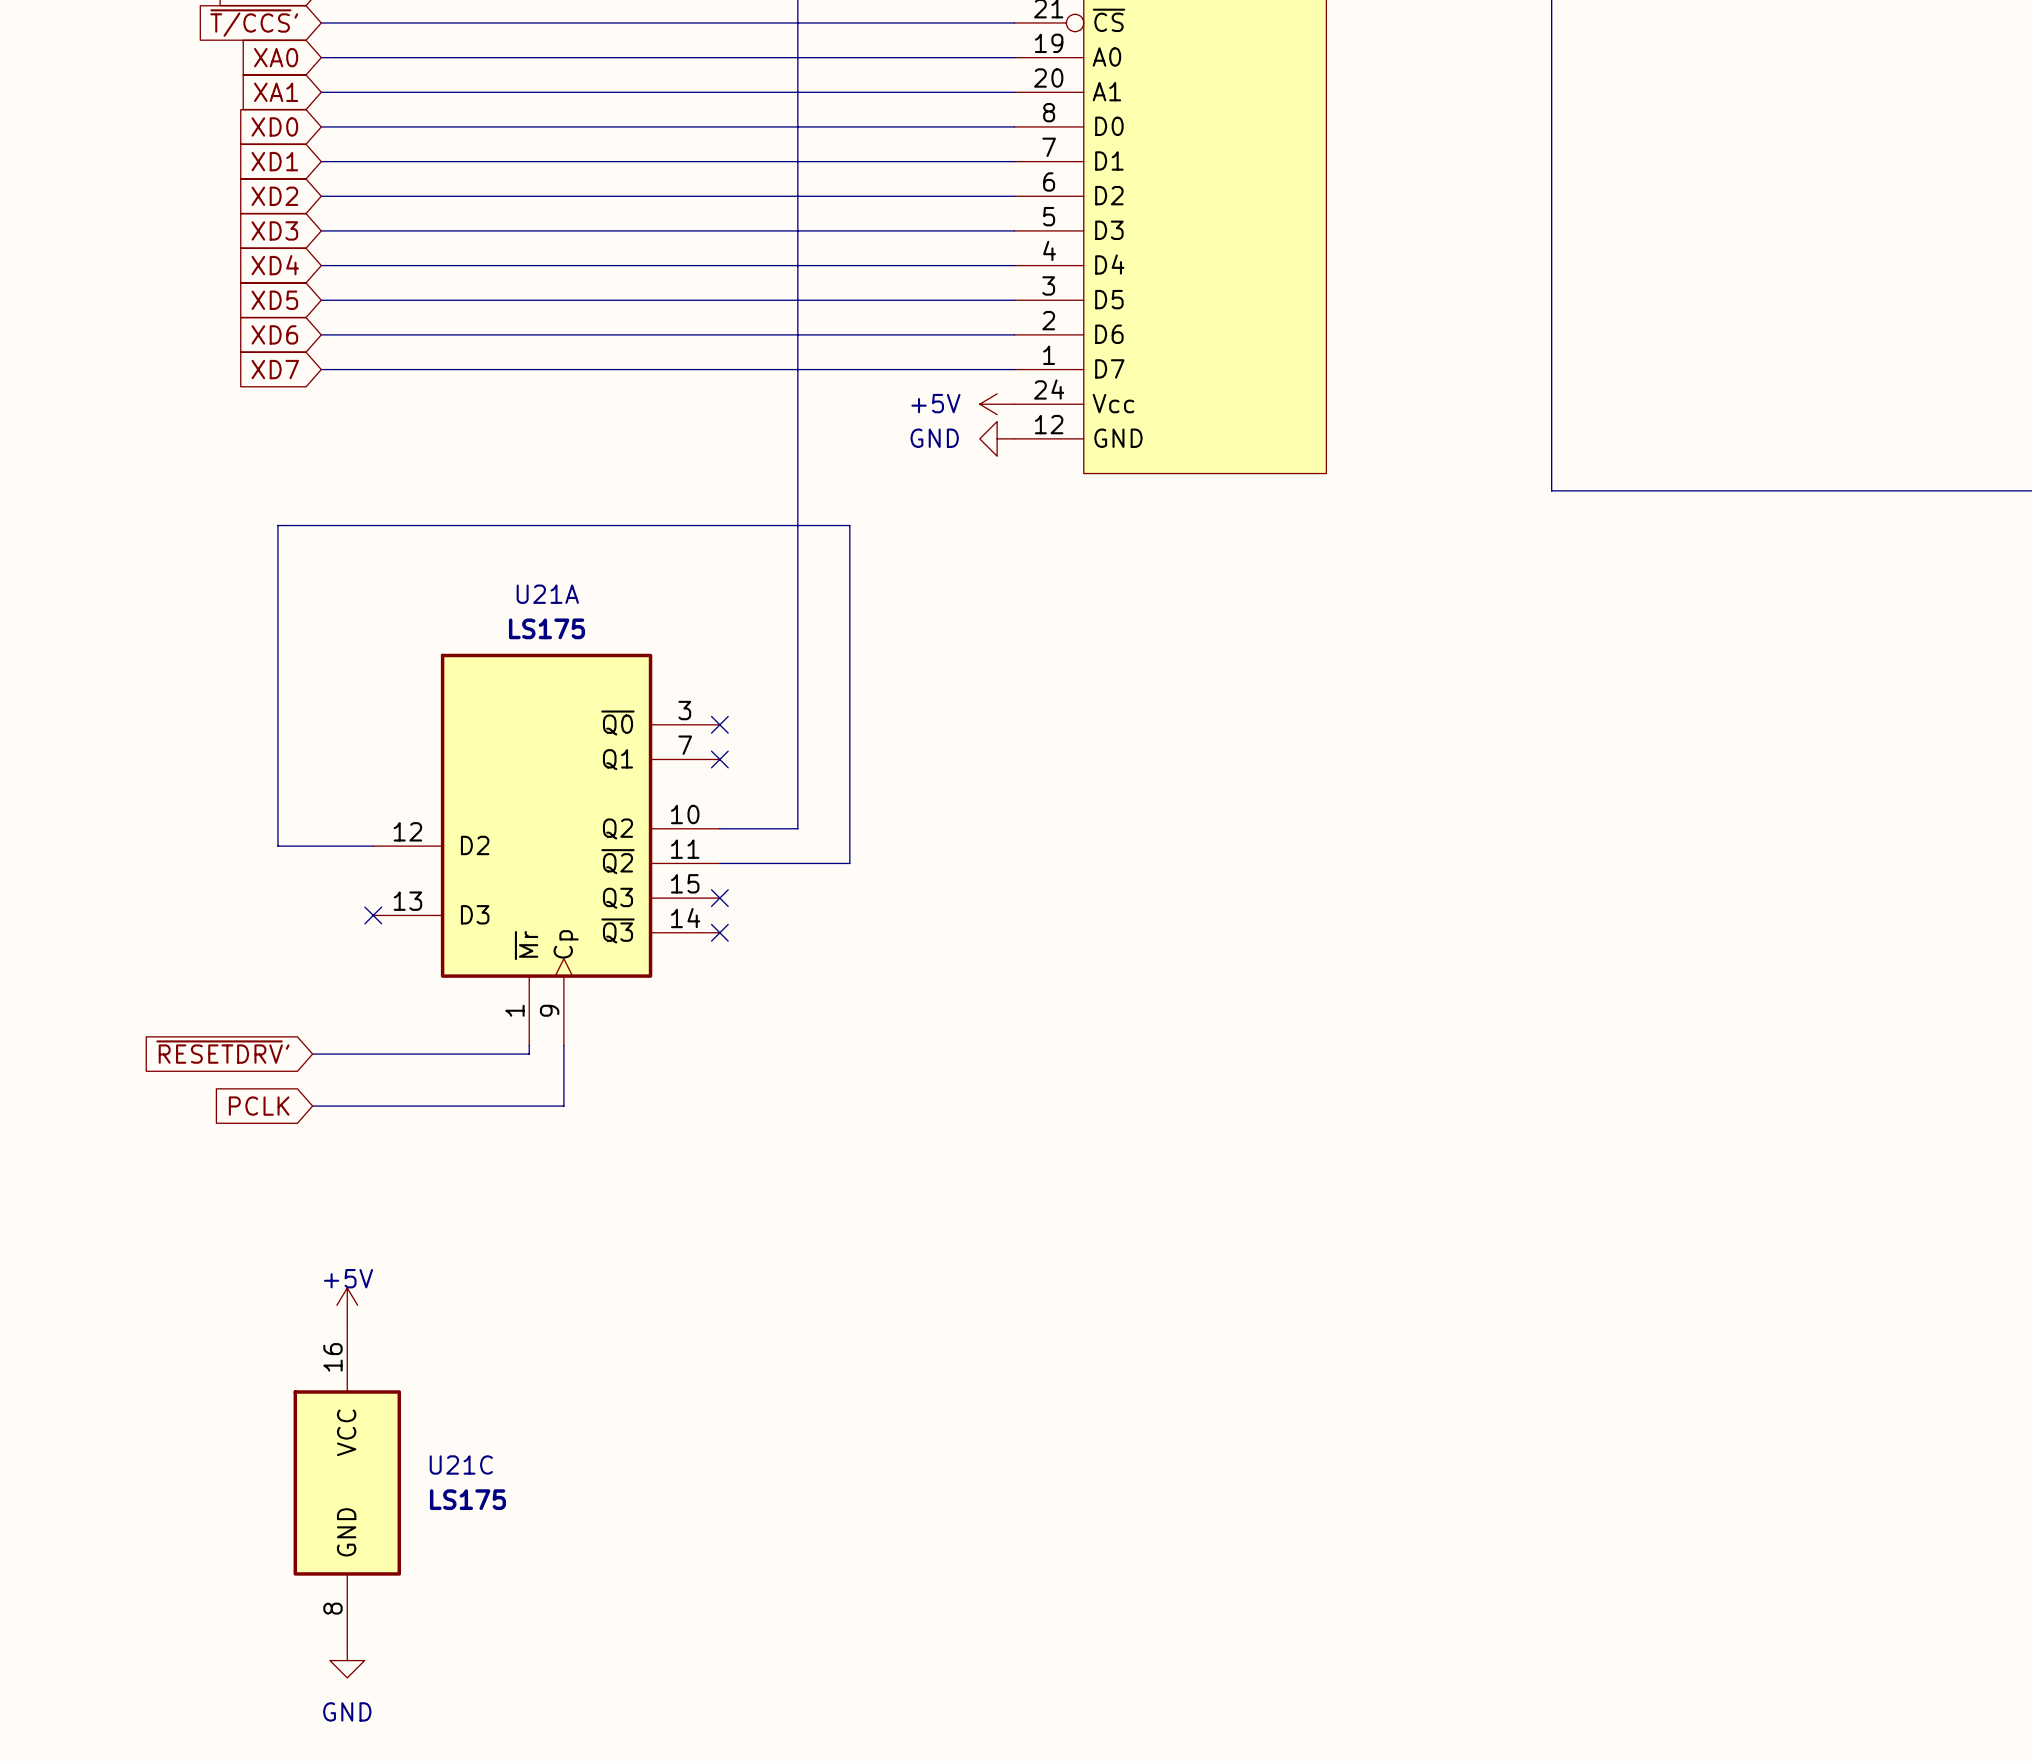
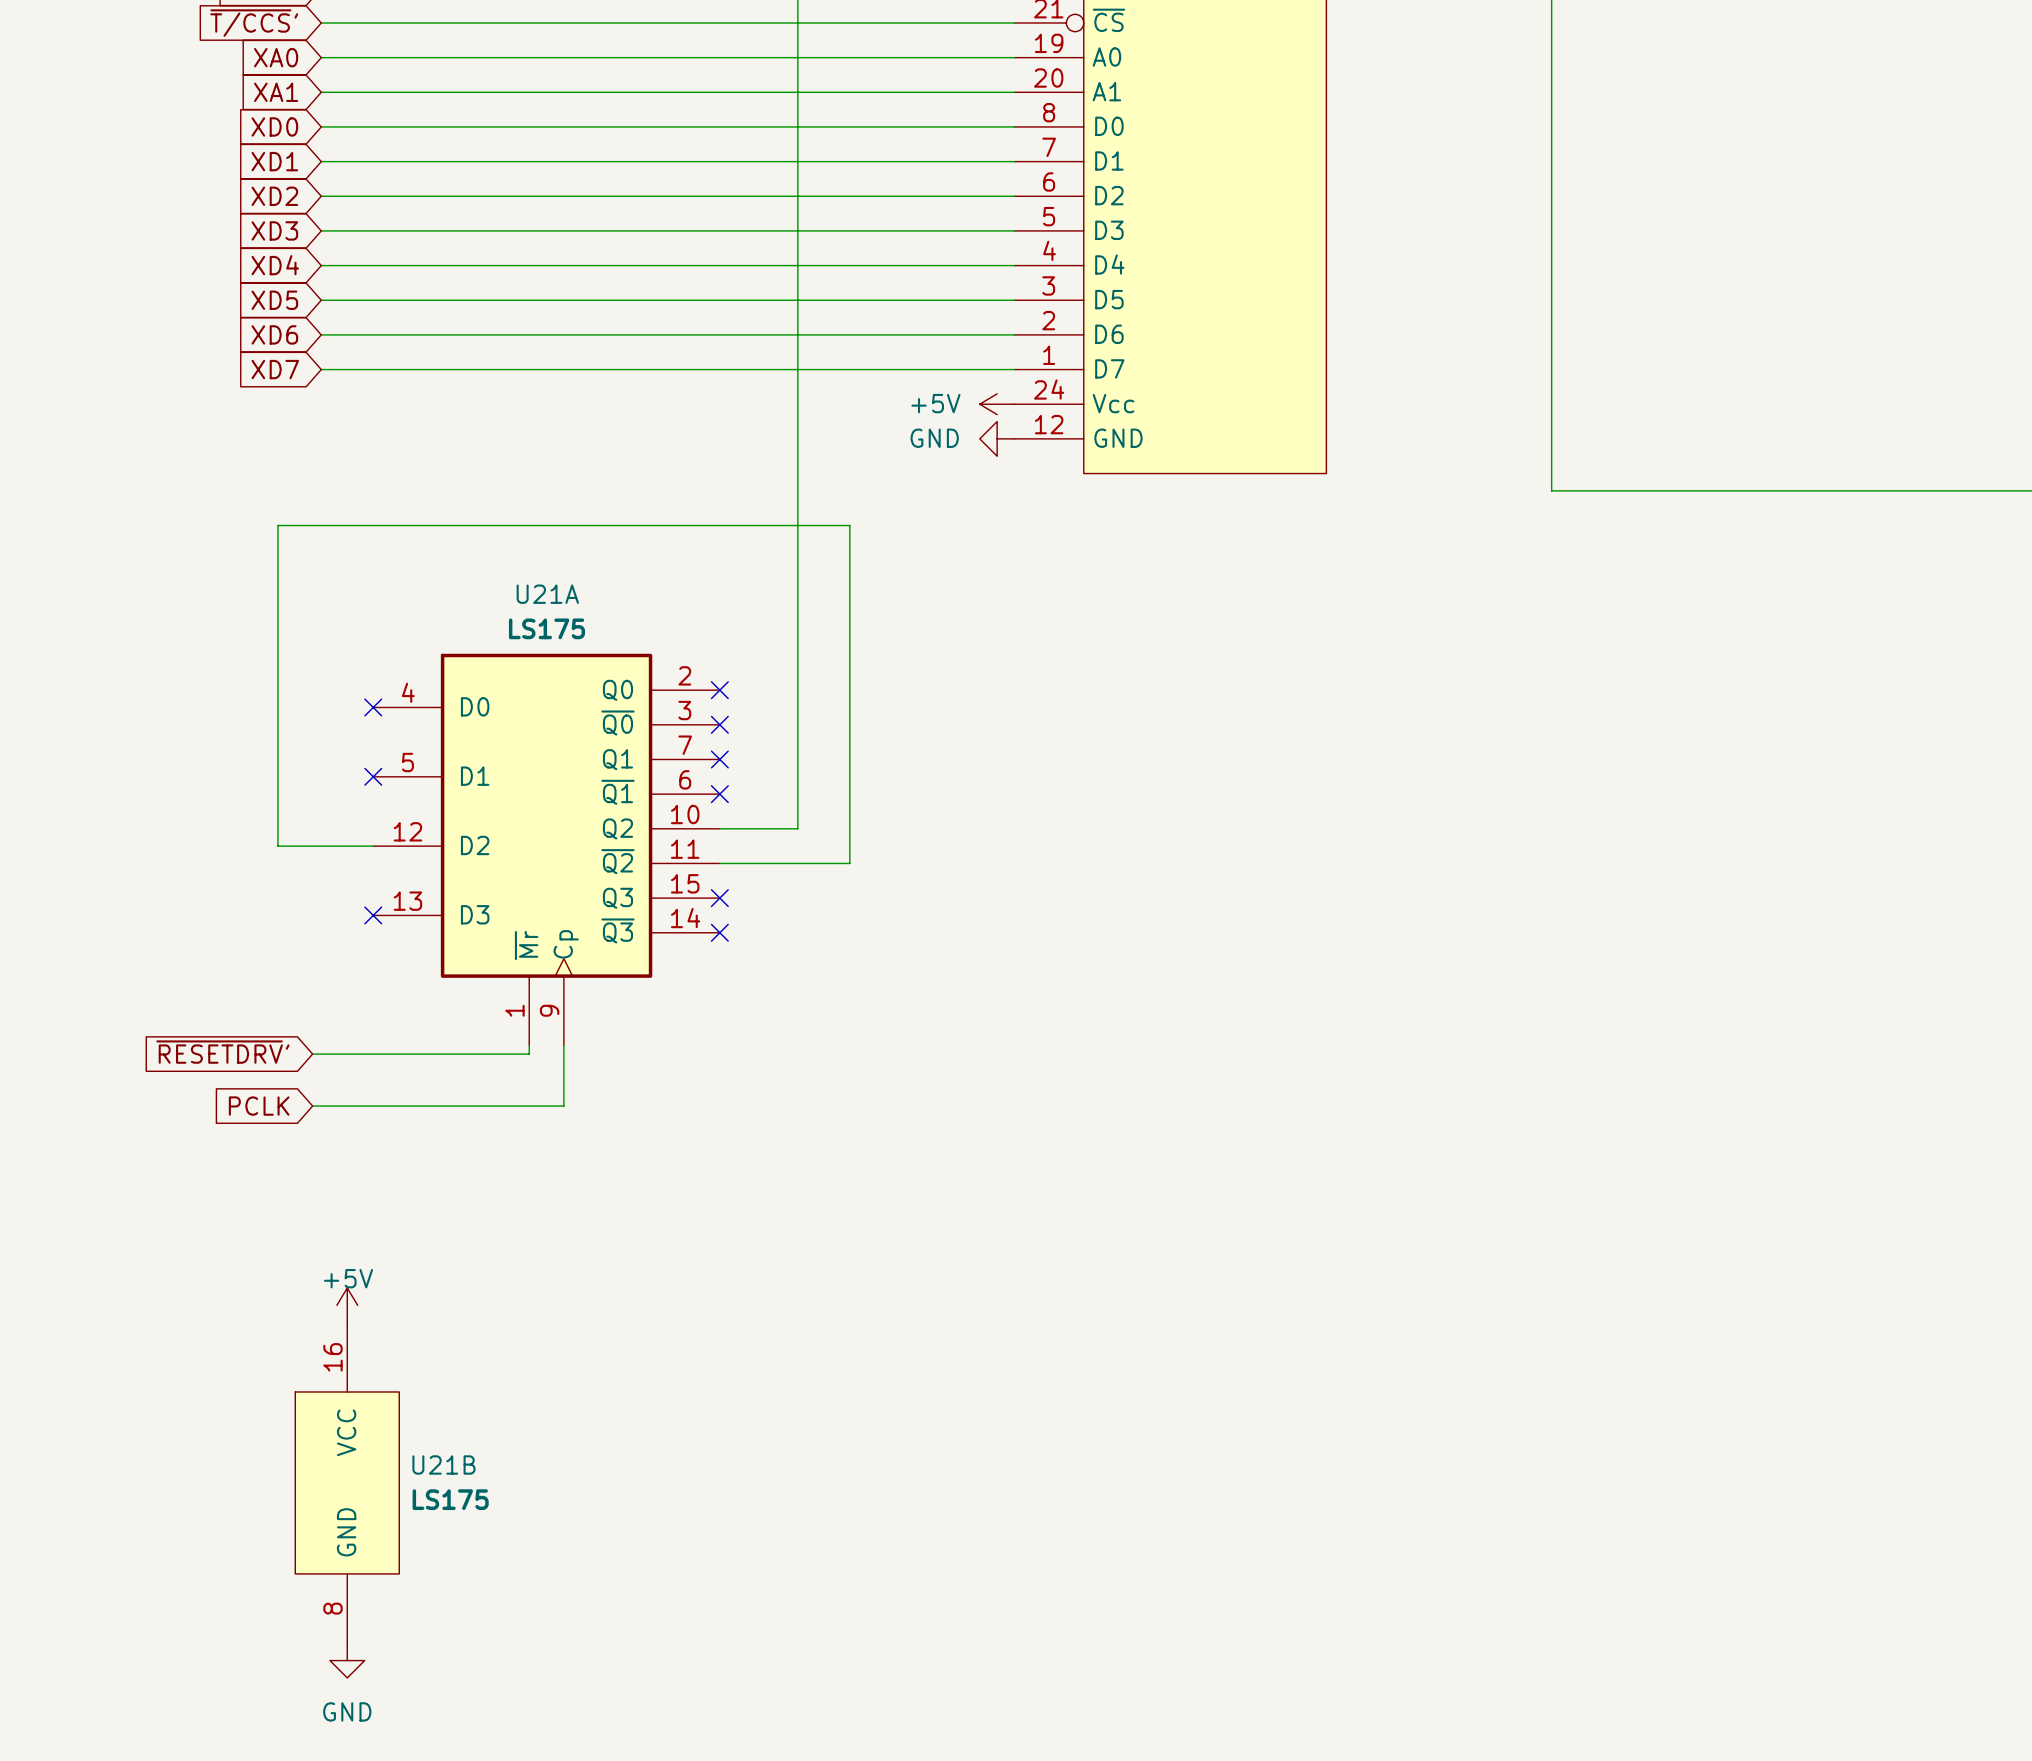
U21A symbol: [373, 653, 720, 1046] -> [373, 653, 720, 1046]
no-connect mark: none -> (719, 690)
no-connect mark: none -> (373, 707)
no-connect mark: none -> (373, 776)
no-connect mark: none -> (719, 794)
U21C: LS175 (347, 1482) -> none
U21B: none -> LS175 (347, 1482)

